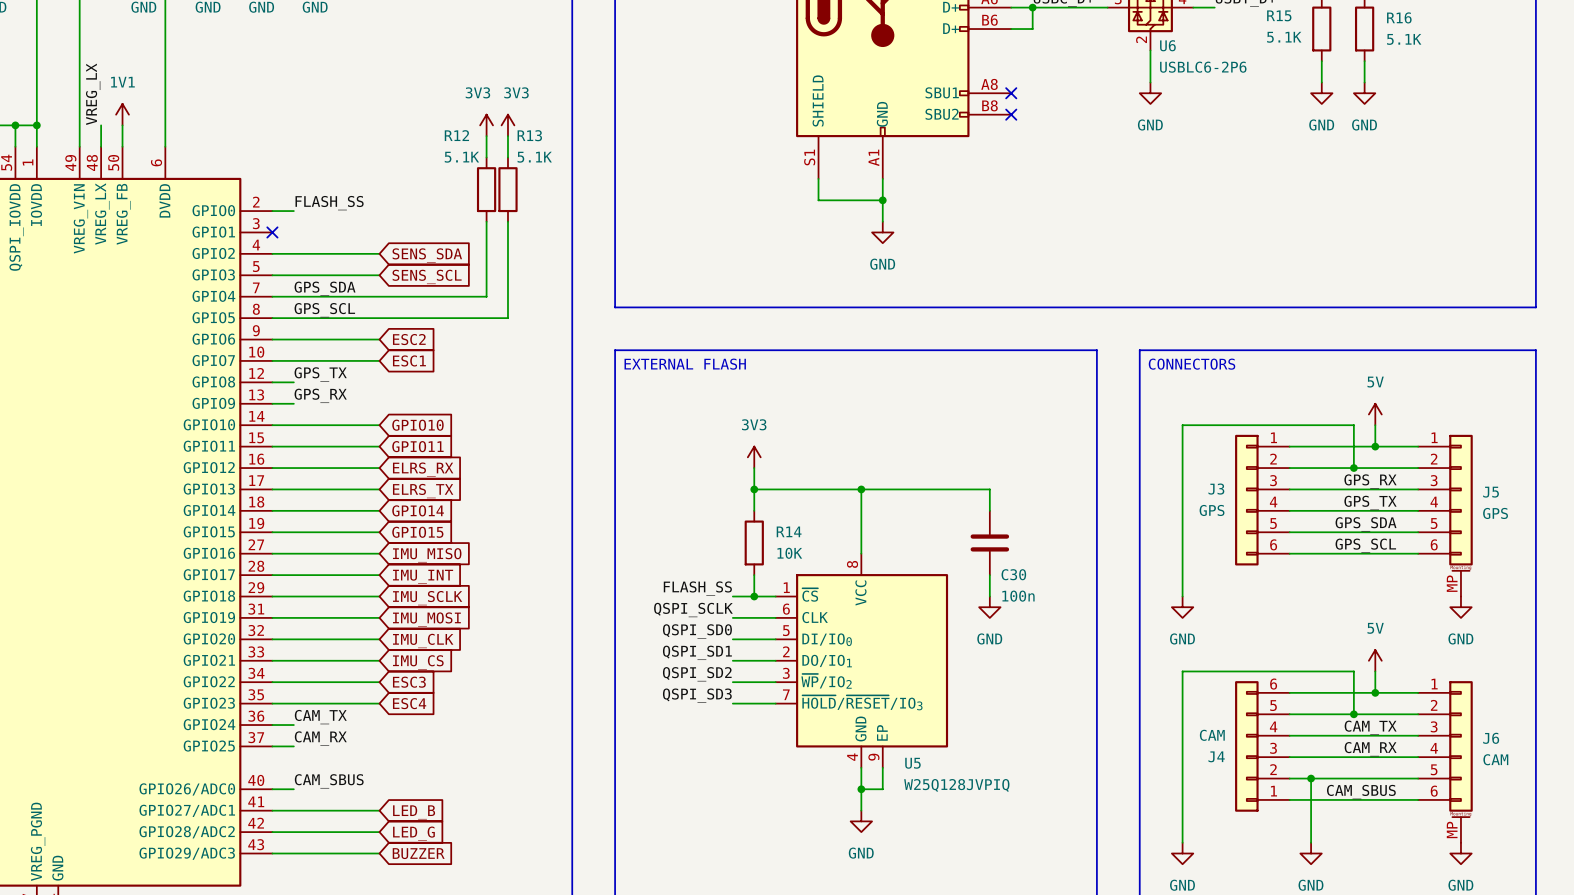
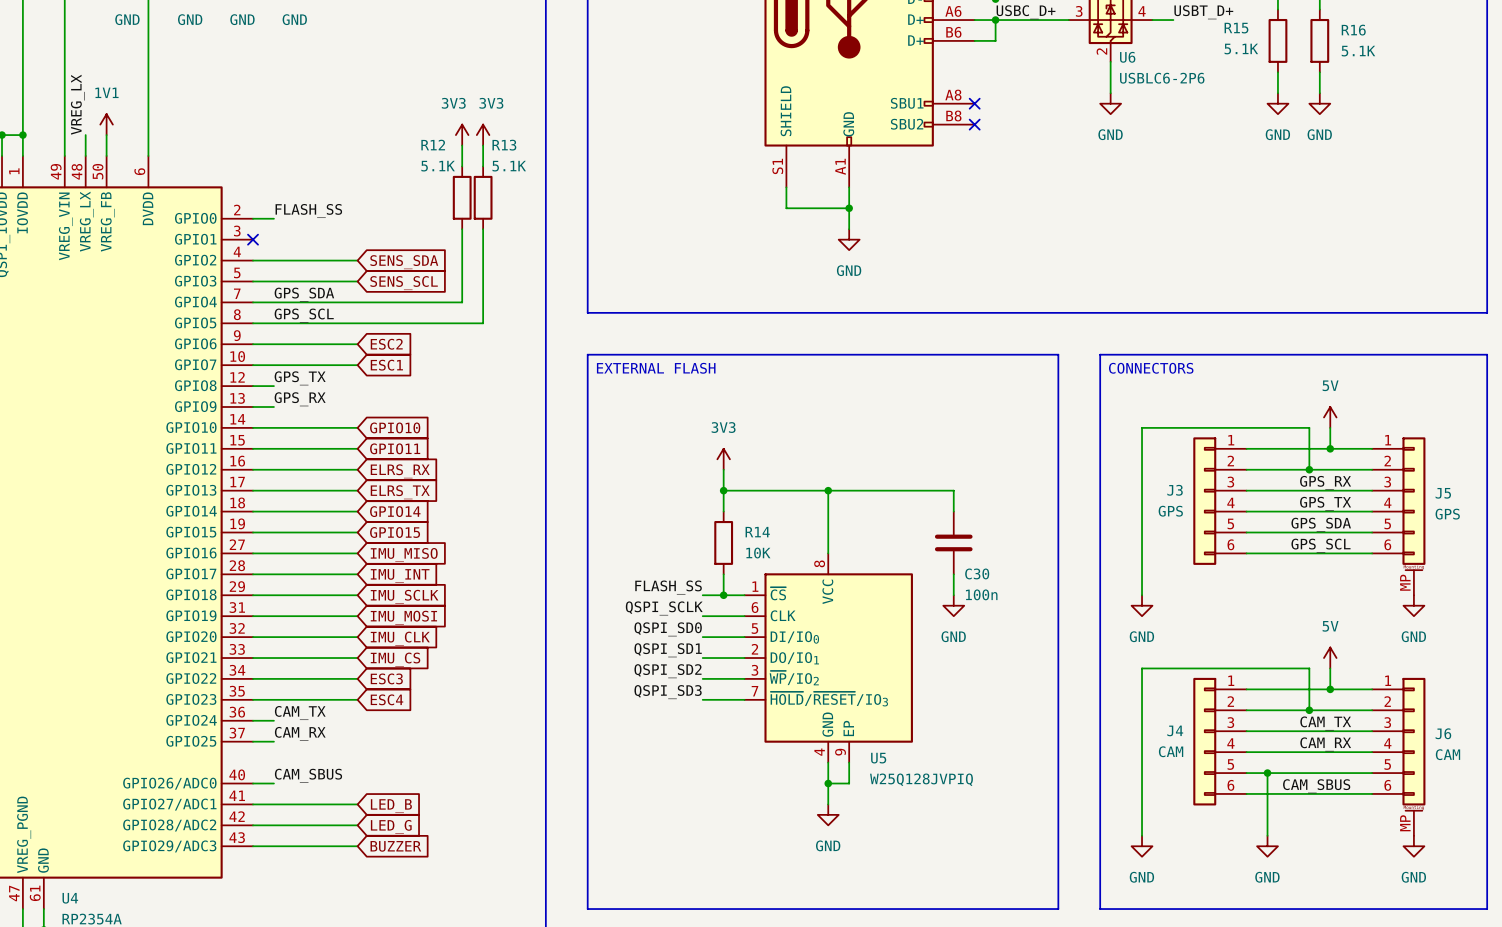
J4 flip: as is (1246, 746) -> up-down (1204, 741)

